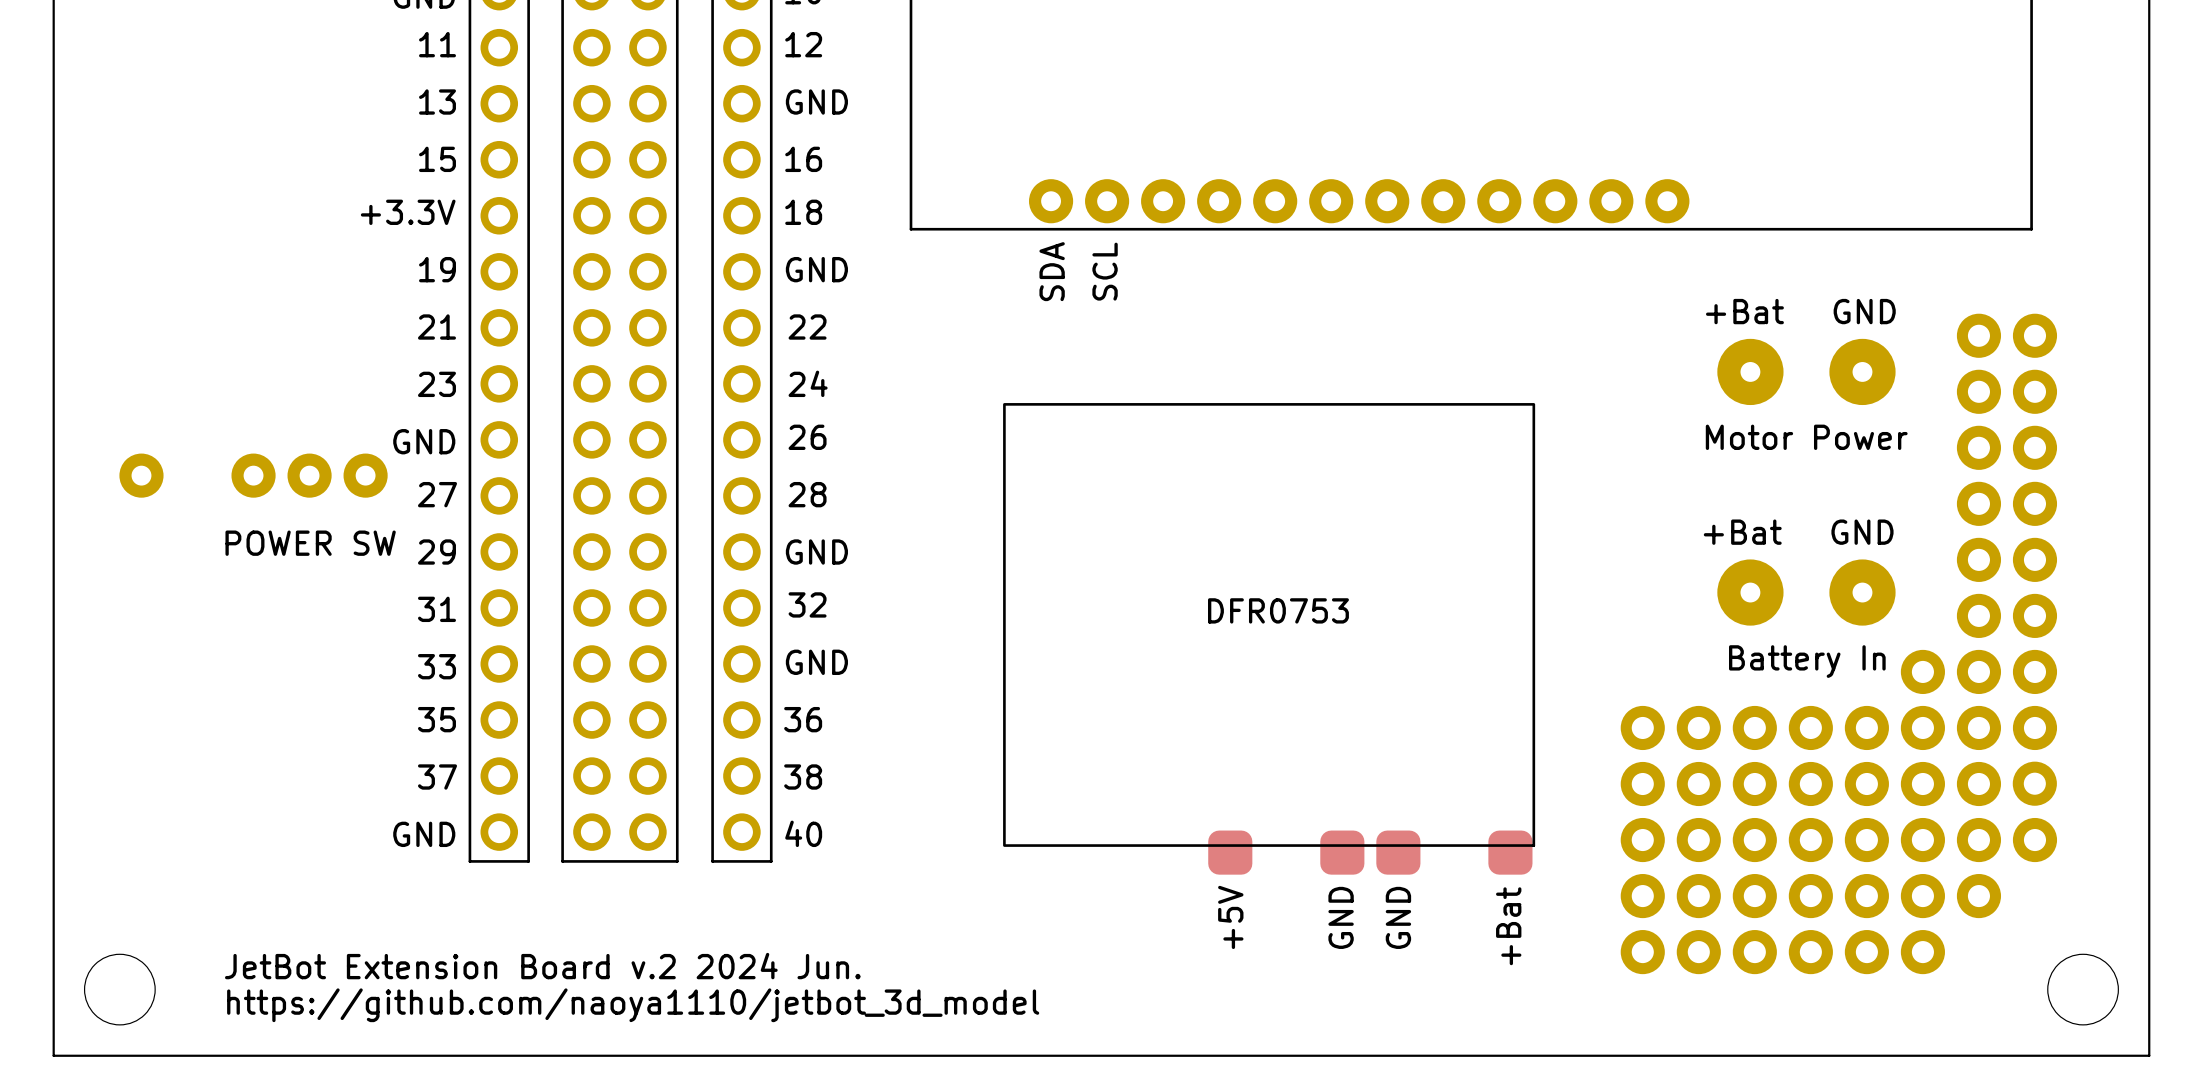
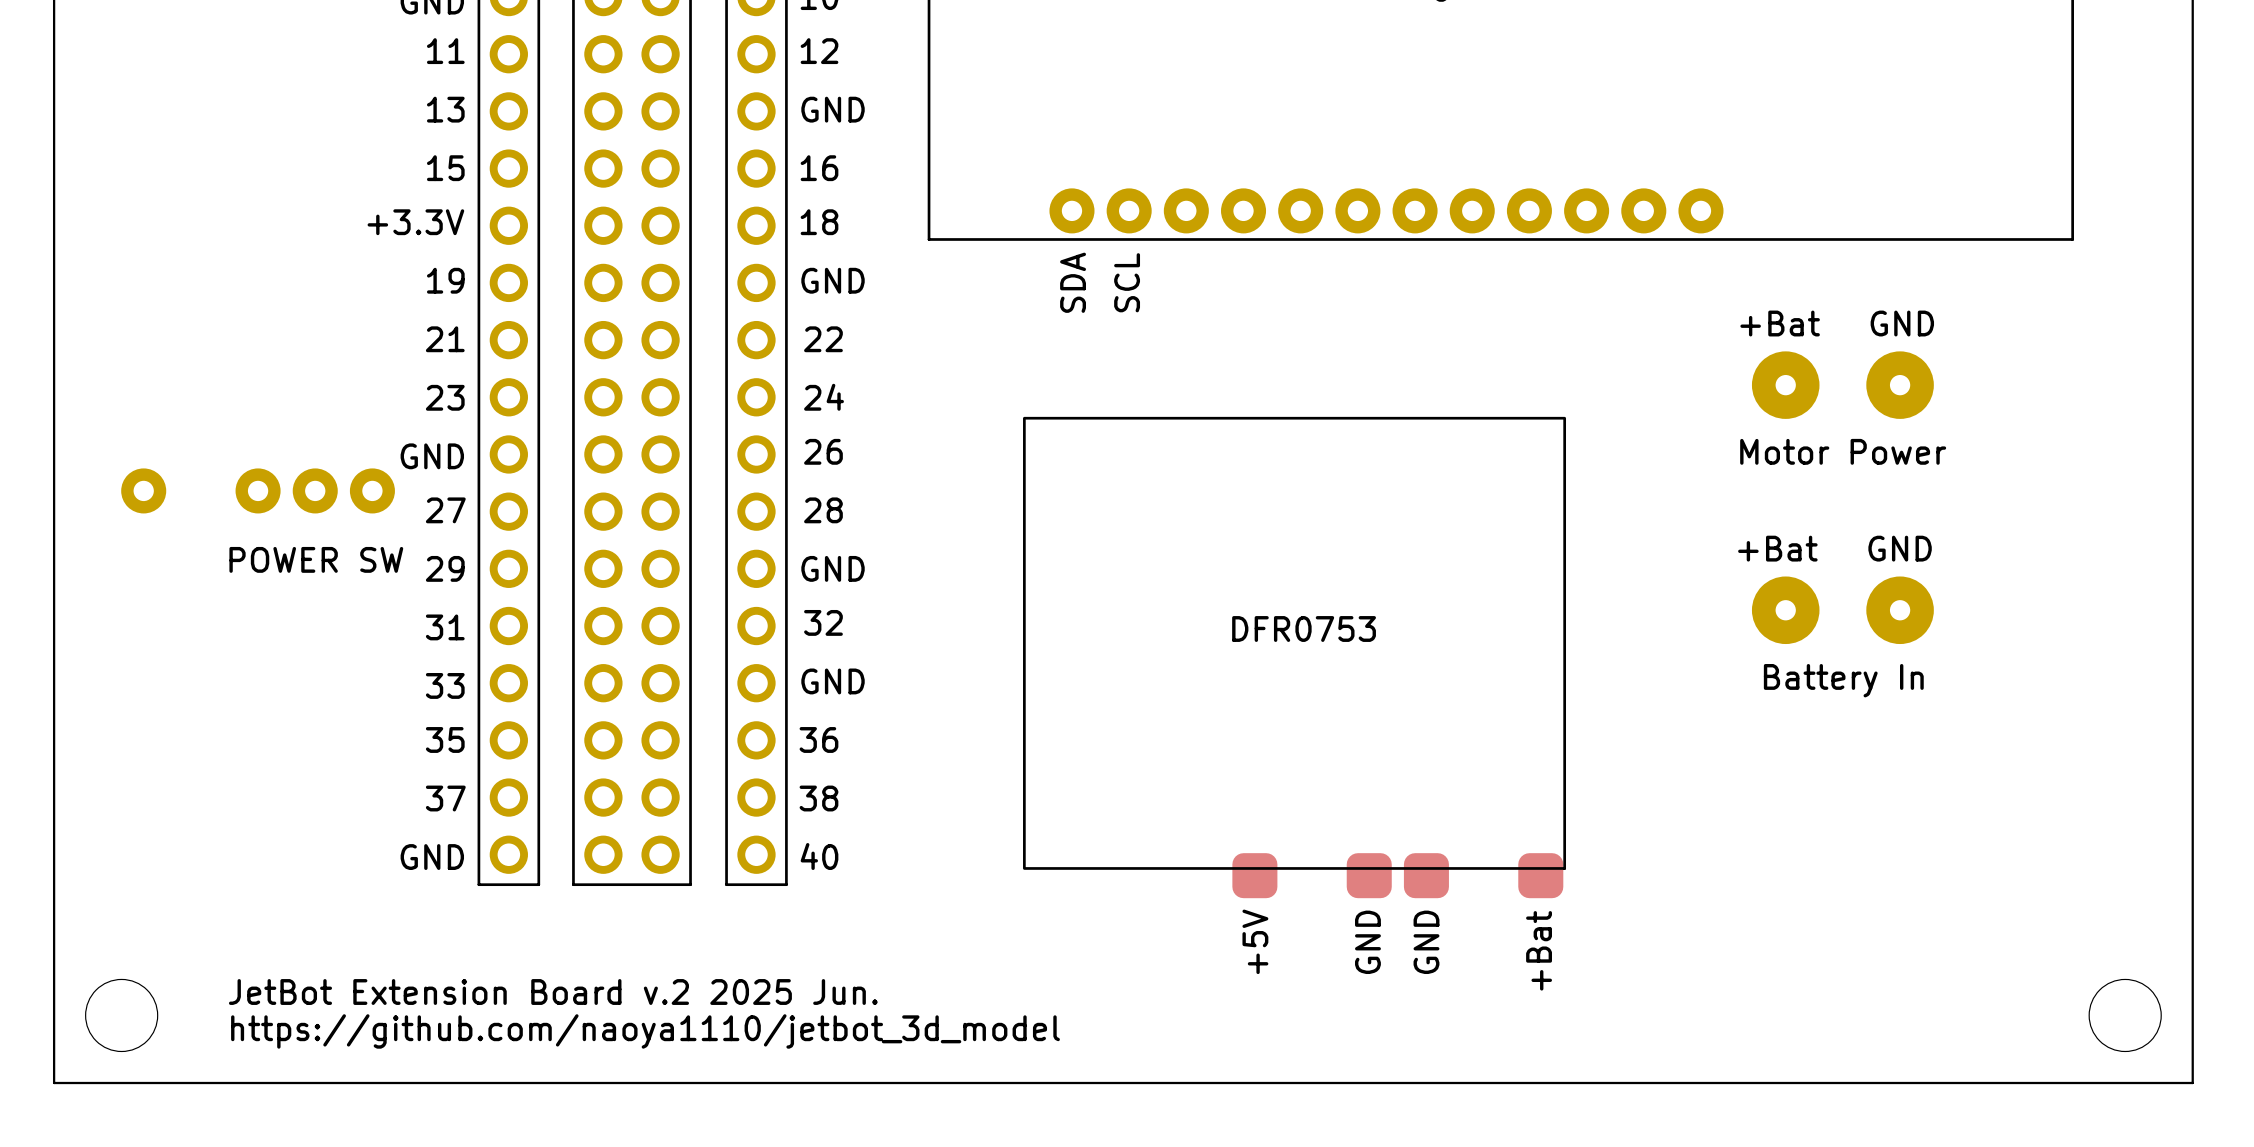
part: (1978, 335) -> none
part: (2034, 335) -> none
part: (1978, 391) -> none
part: (2034, 391) -> none
part: (1978, 447) -> none
part: (2034, 447) -> none
part: (1978, 503) -> none
part: (2034, 503) -> none
part: (1978, 559) -> none
part: (2034, 559) -> none
part: (1978, 615) -> none
part: (2034, 615) -> none
part: (1922, 671) -> none
part: (1978, 671) -> none
part: (2034, 671) -> none
part: (1642, 727) -> none
part: (1698, 727) -> none
part: (1754, 727) -> none
part: (1810, 727) -> none
part: (1866, 727) -> none
part: (1922, 727) -> none
part: (1978, 727) -> none
part: (2034, 727) -> none
part: (2034, 783) -> none
part: (1642, 784) -> none
part: (1698, 784) -> none
part: (1754, 784) -> none
part: (1810, 784) -> none
part: (1866, 784) -> none
part: (1922, 784) -> none
part: (1978, 784) -> none
part: (1642, 840) -> none
part: (1698, 840) -> none
part: (1754, 840) -> none
part: (1810, 840) -> none
part: (1866, 840) -> none
part: (1922, 840) -> none
part: (1978, 840) -> none
part: (2034, 840) -> none
part: (1642, 896) -> none
part: (1698, 896) -> none
part: (1754, 896) -> none
part: (1810, 896) -> none
part: (1866, 896) -> none
part: (1922, 896) -> none
part: (1978, 896) -> none
part: (1642, 952) -> none
part: (1698, 952) -> none
part: (1754, 952) -> none
part: (1810, 952) -> none
part: (1866, 952) -> none
part: (1922, 952) -> none
text: JetBot Extension Board v.2 2024 Jun. (542, 966) -> JetBot Extension Board v.2 2025 Jun. (553, 992)

